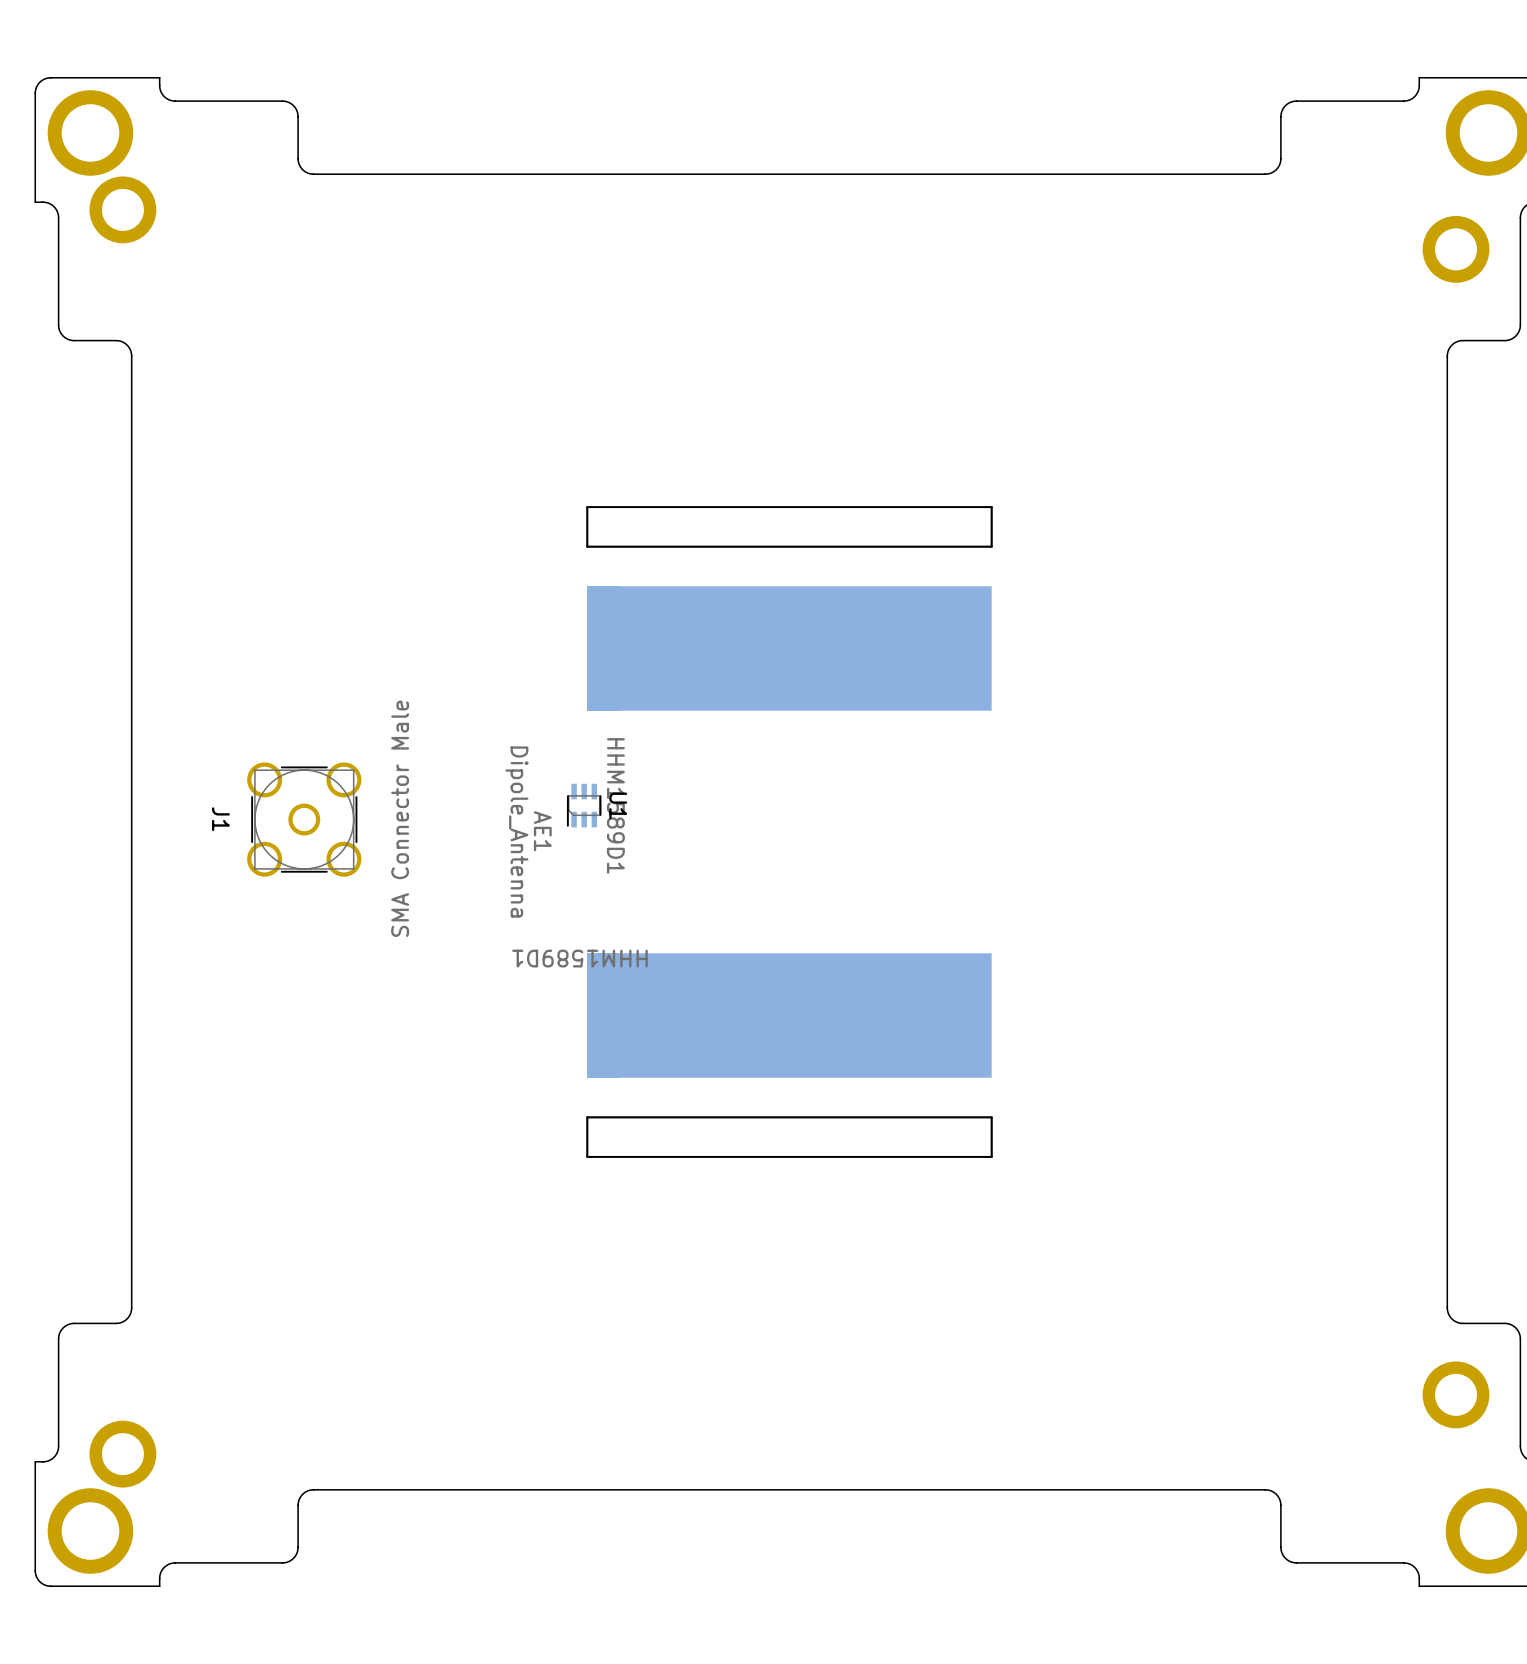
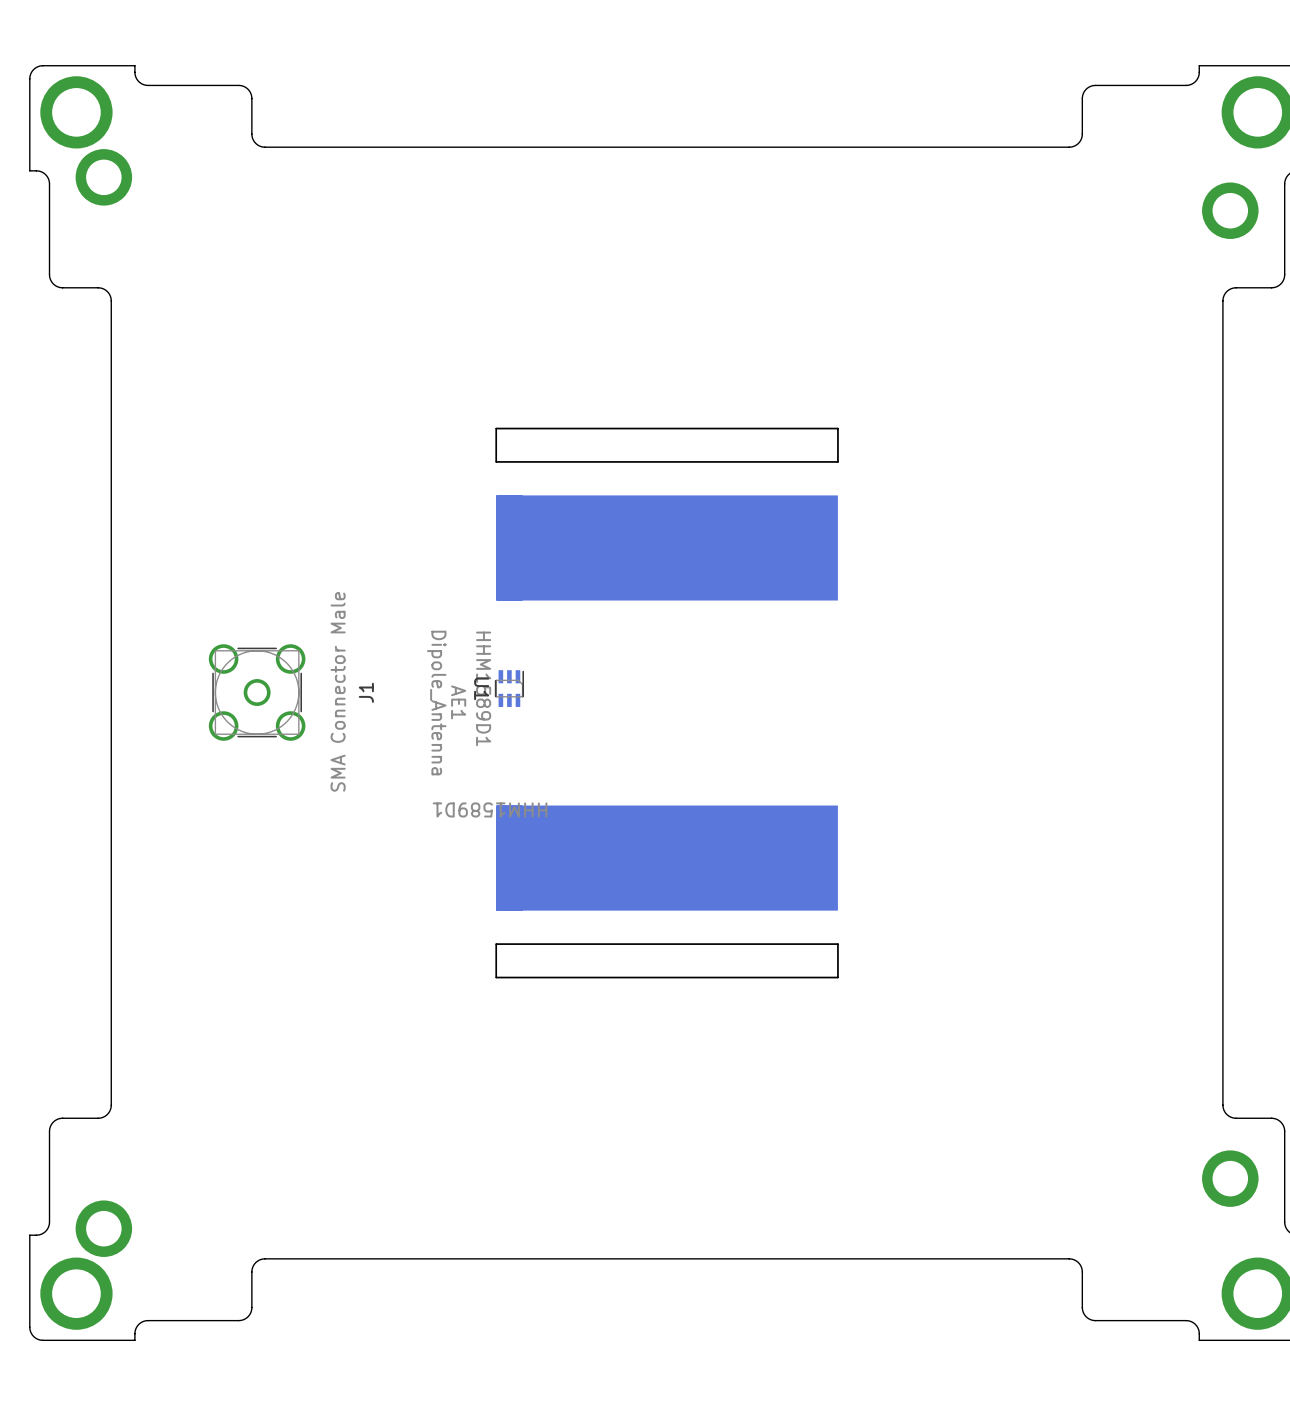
U1 rotation: 0° (584, 805) -> 180° (509, 688)
J1 name rotation: 0° (220, 819) -> 180° (366, 692)
J1 name position: J1 (220, 819) -> J1 (366, 692)

